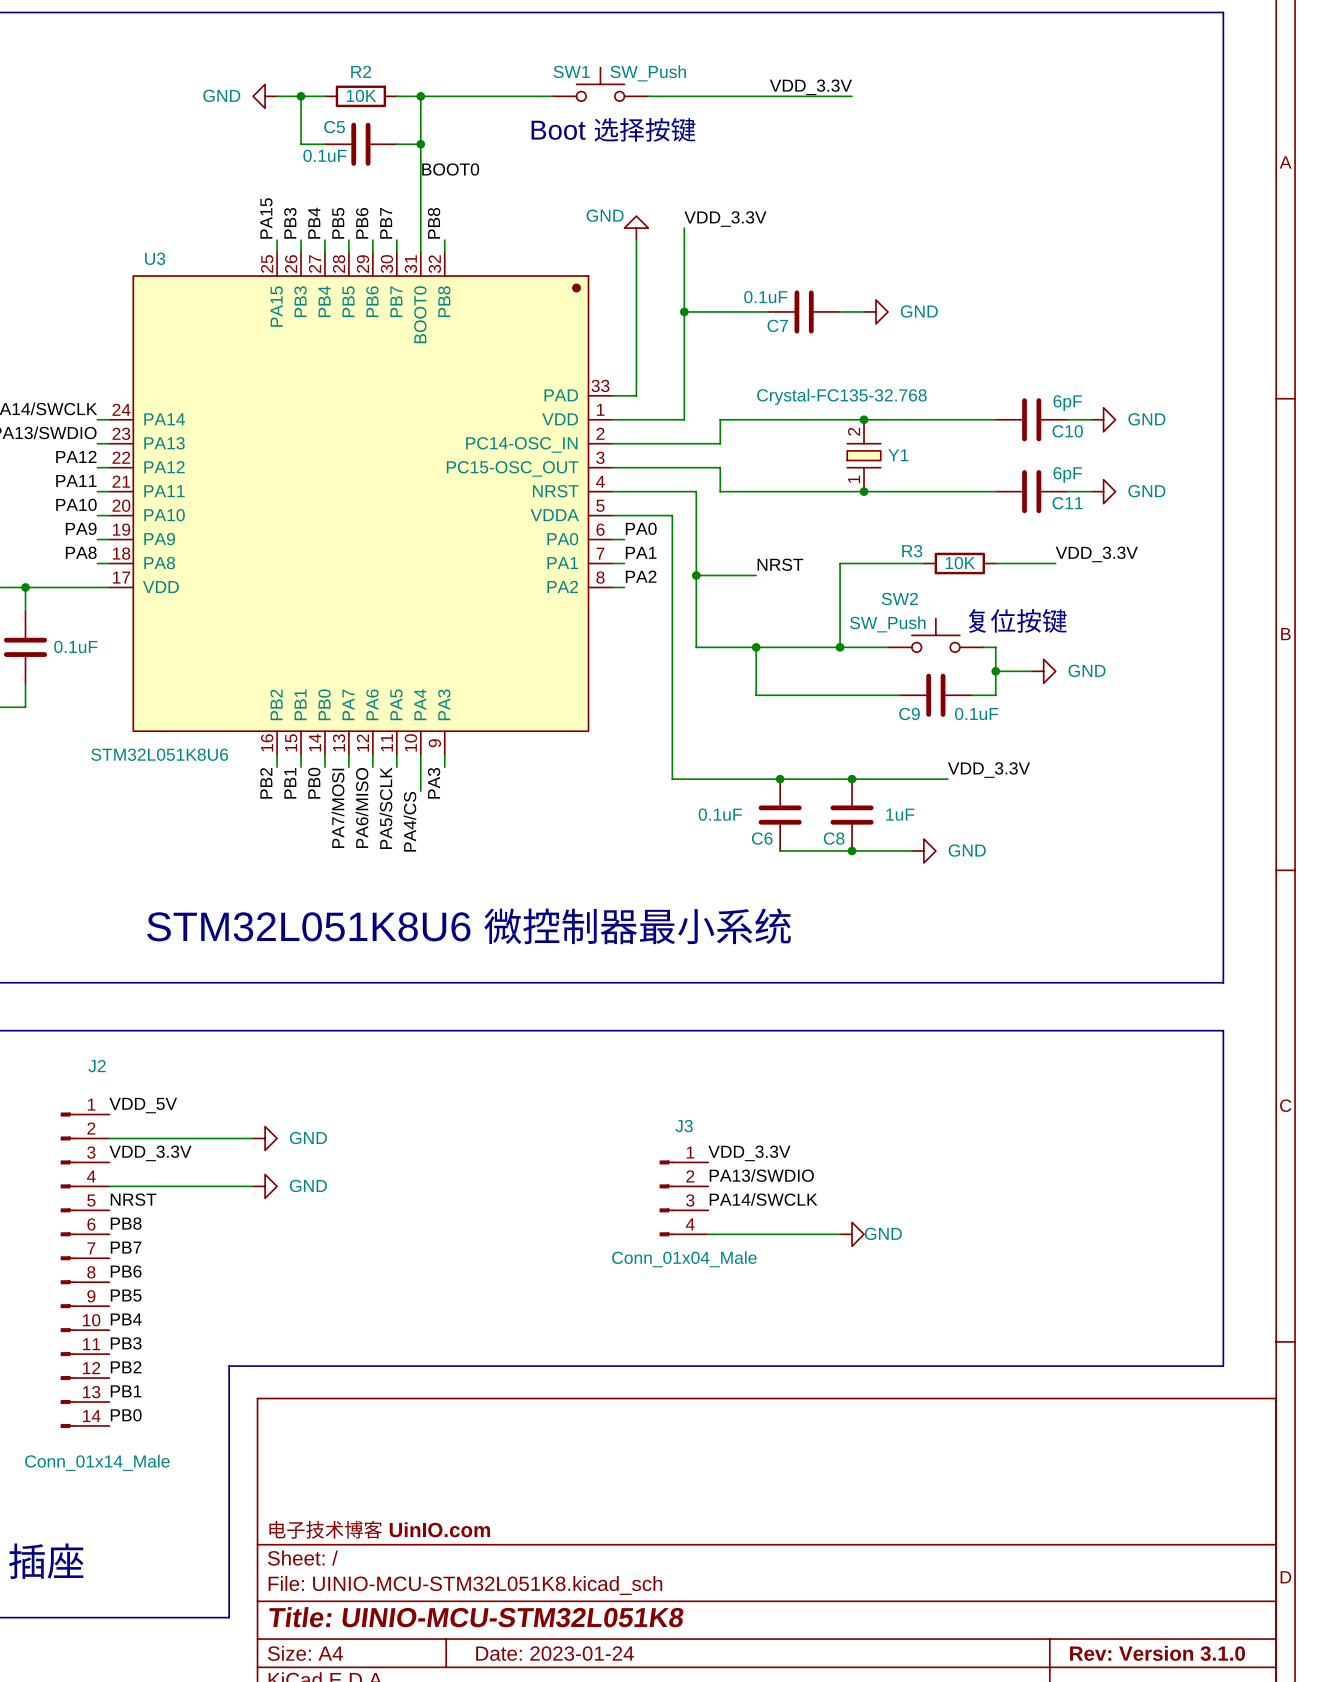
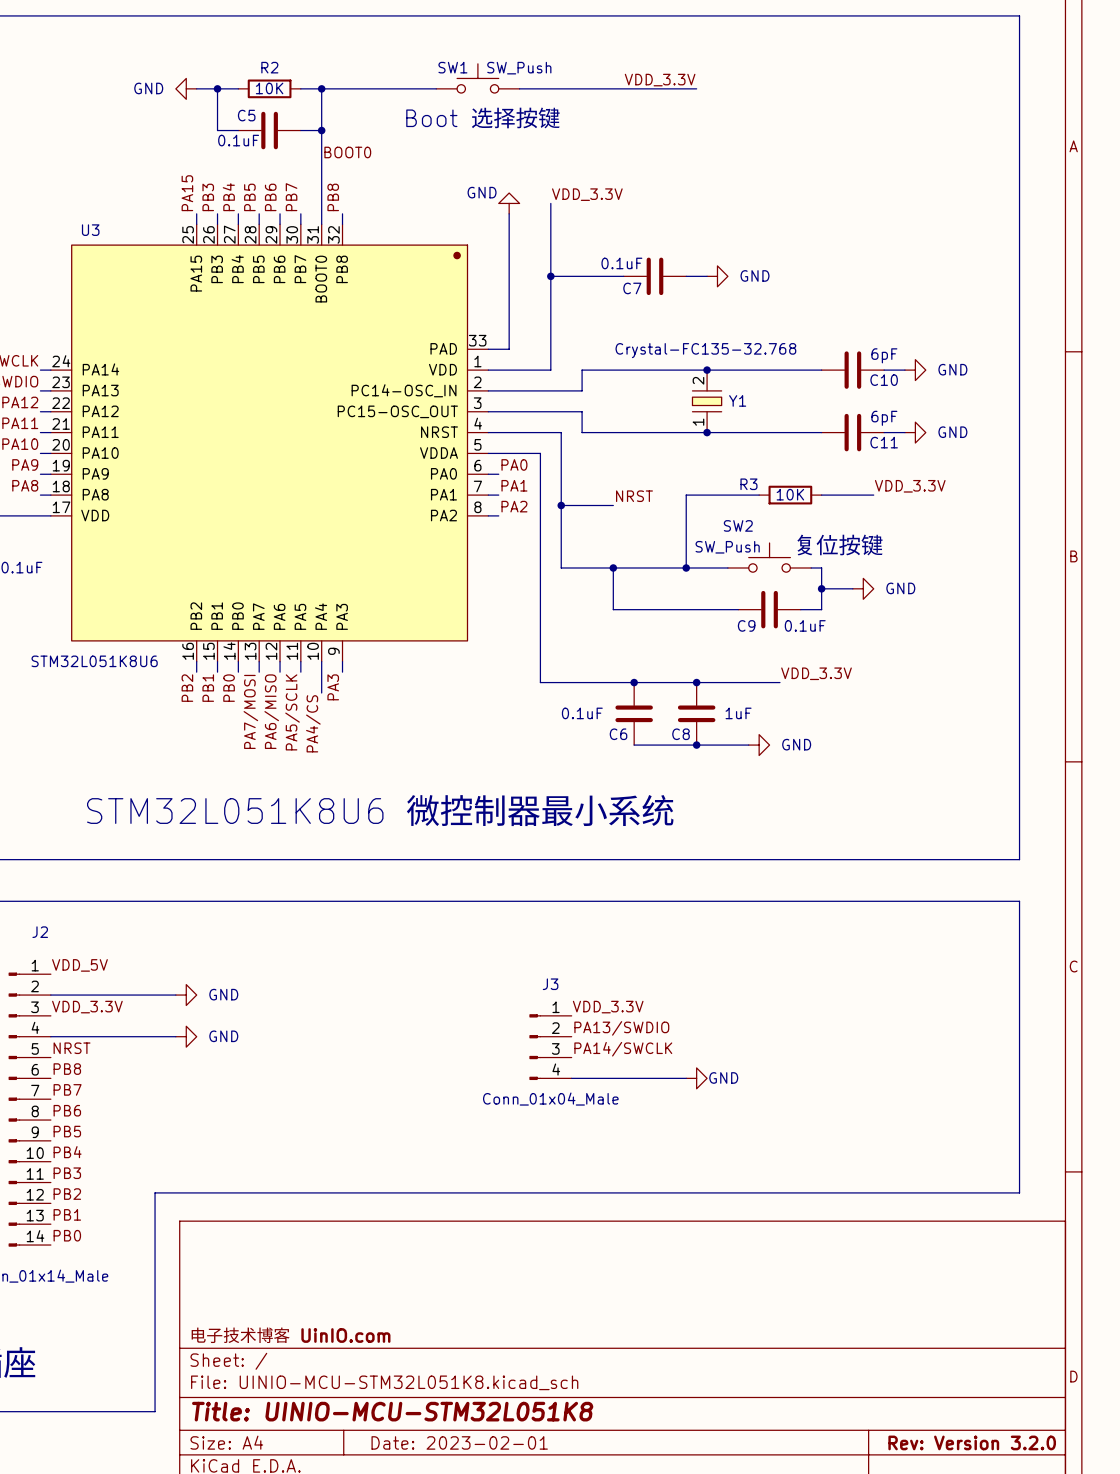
title block: Date: 2023-01-24 (555, 1653) -> Date: 2023-02-01 (459, 1442)
title block: Rev: Version 3.1.0 (1157, 1653) -> Rev: Version 3.2.0 (972, 1442)

